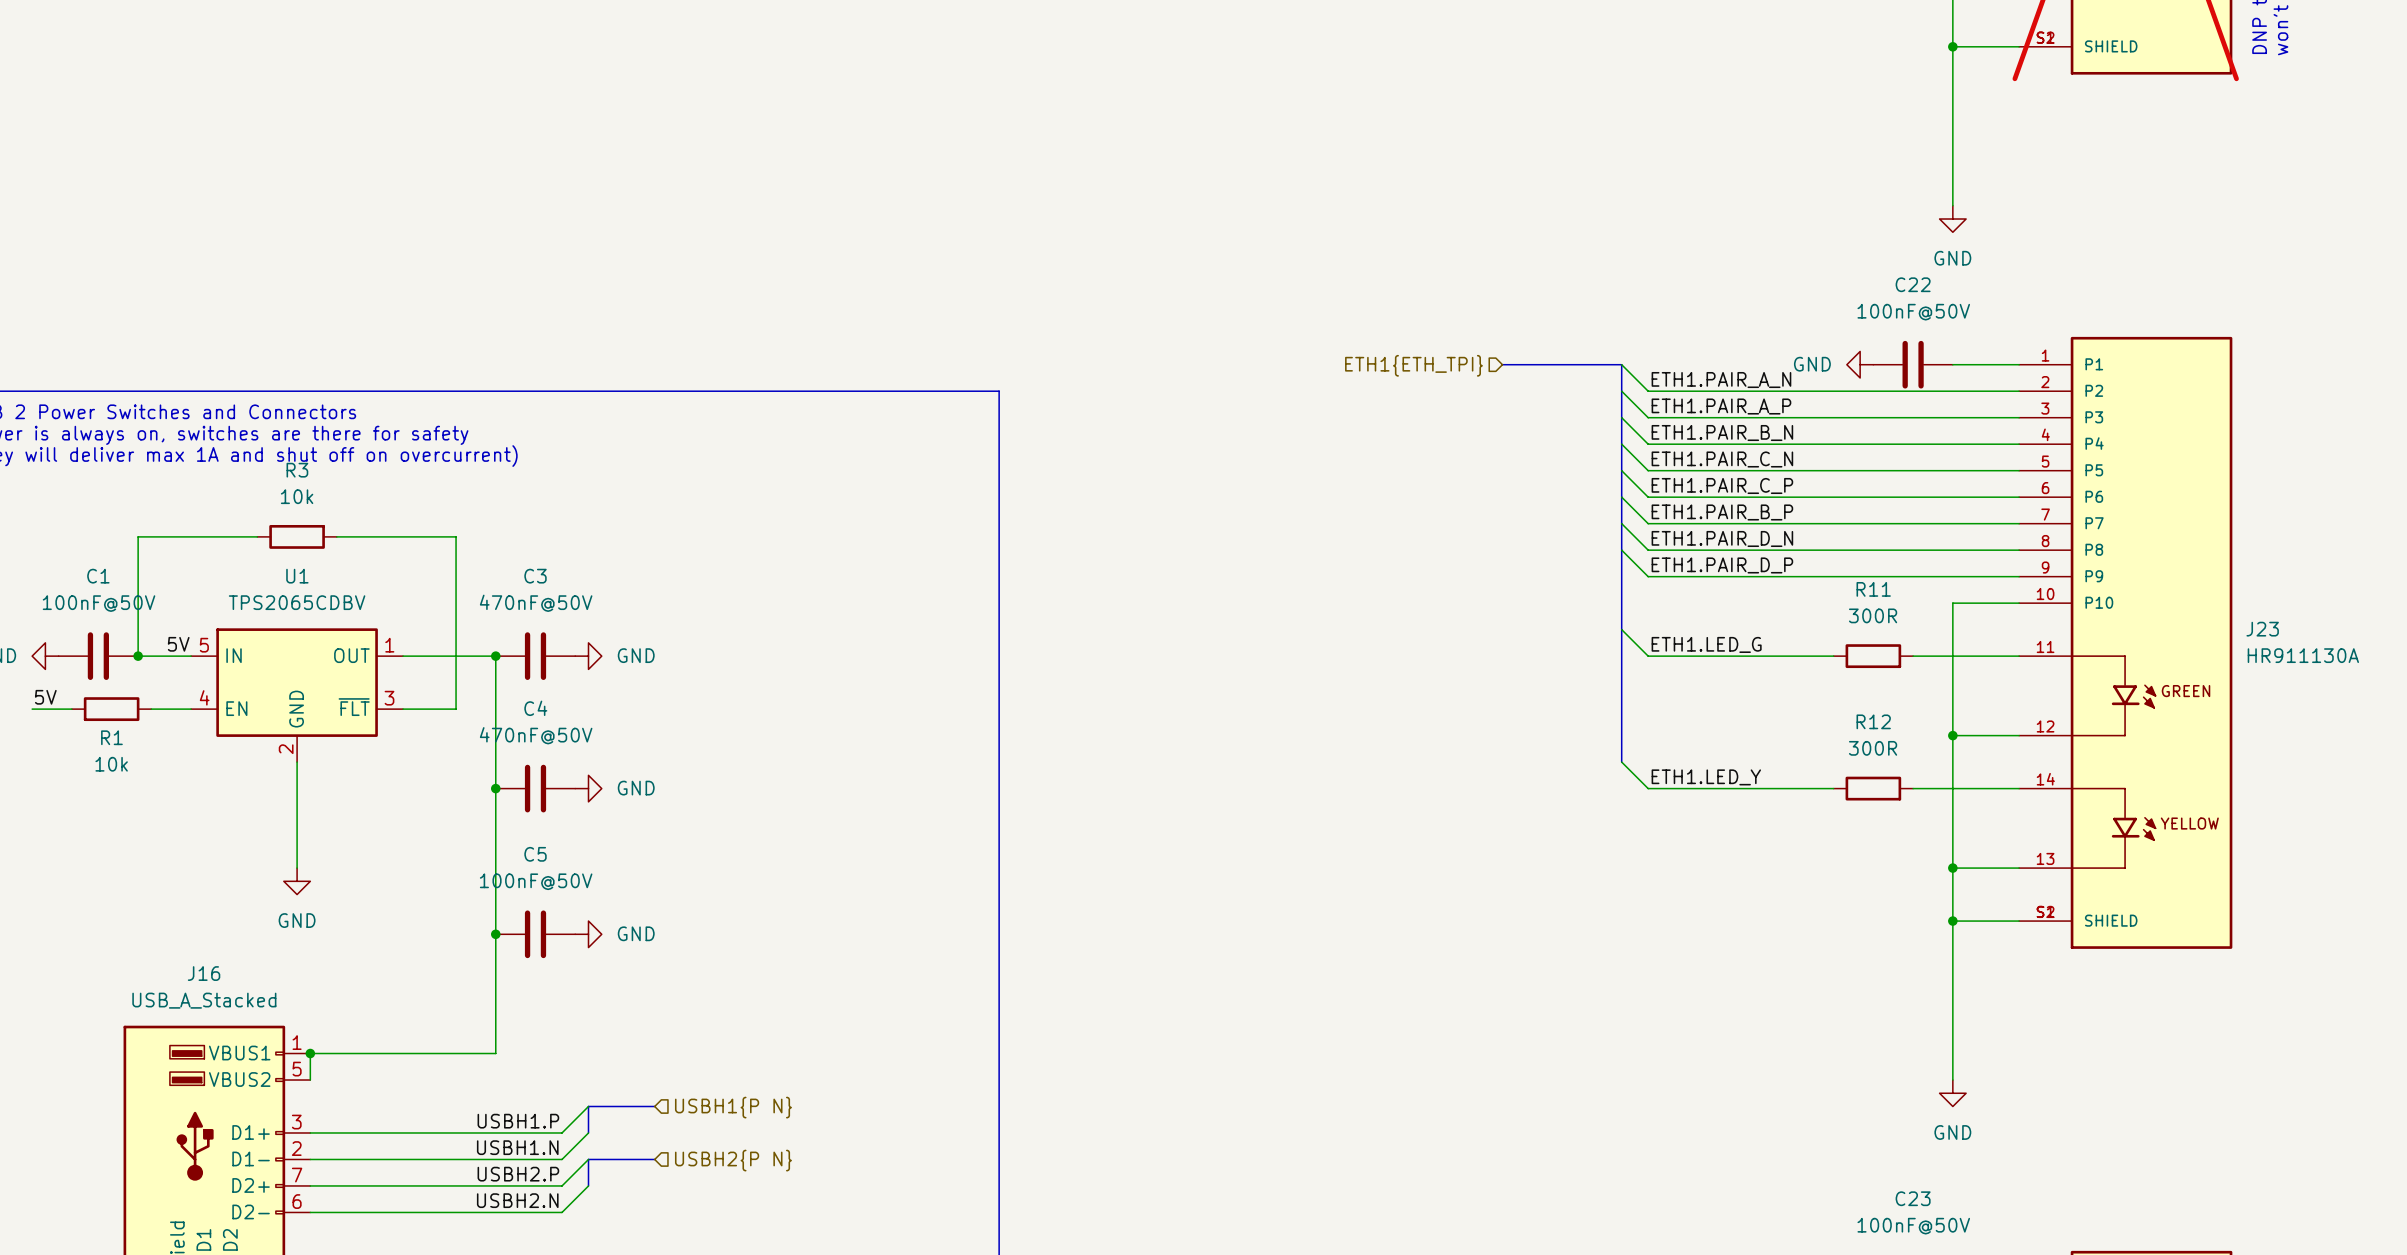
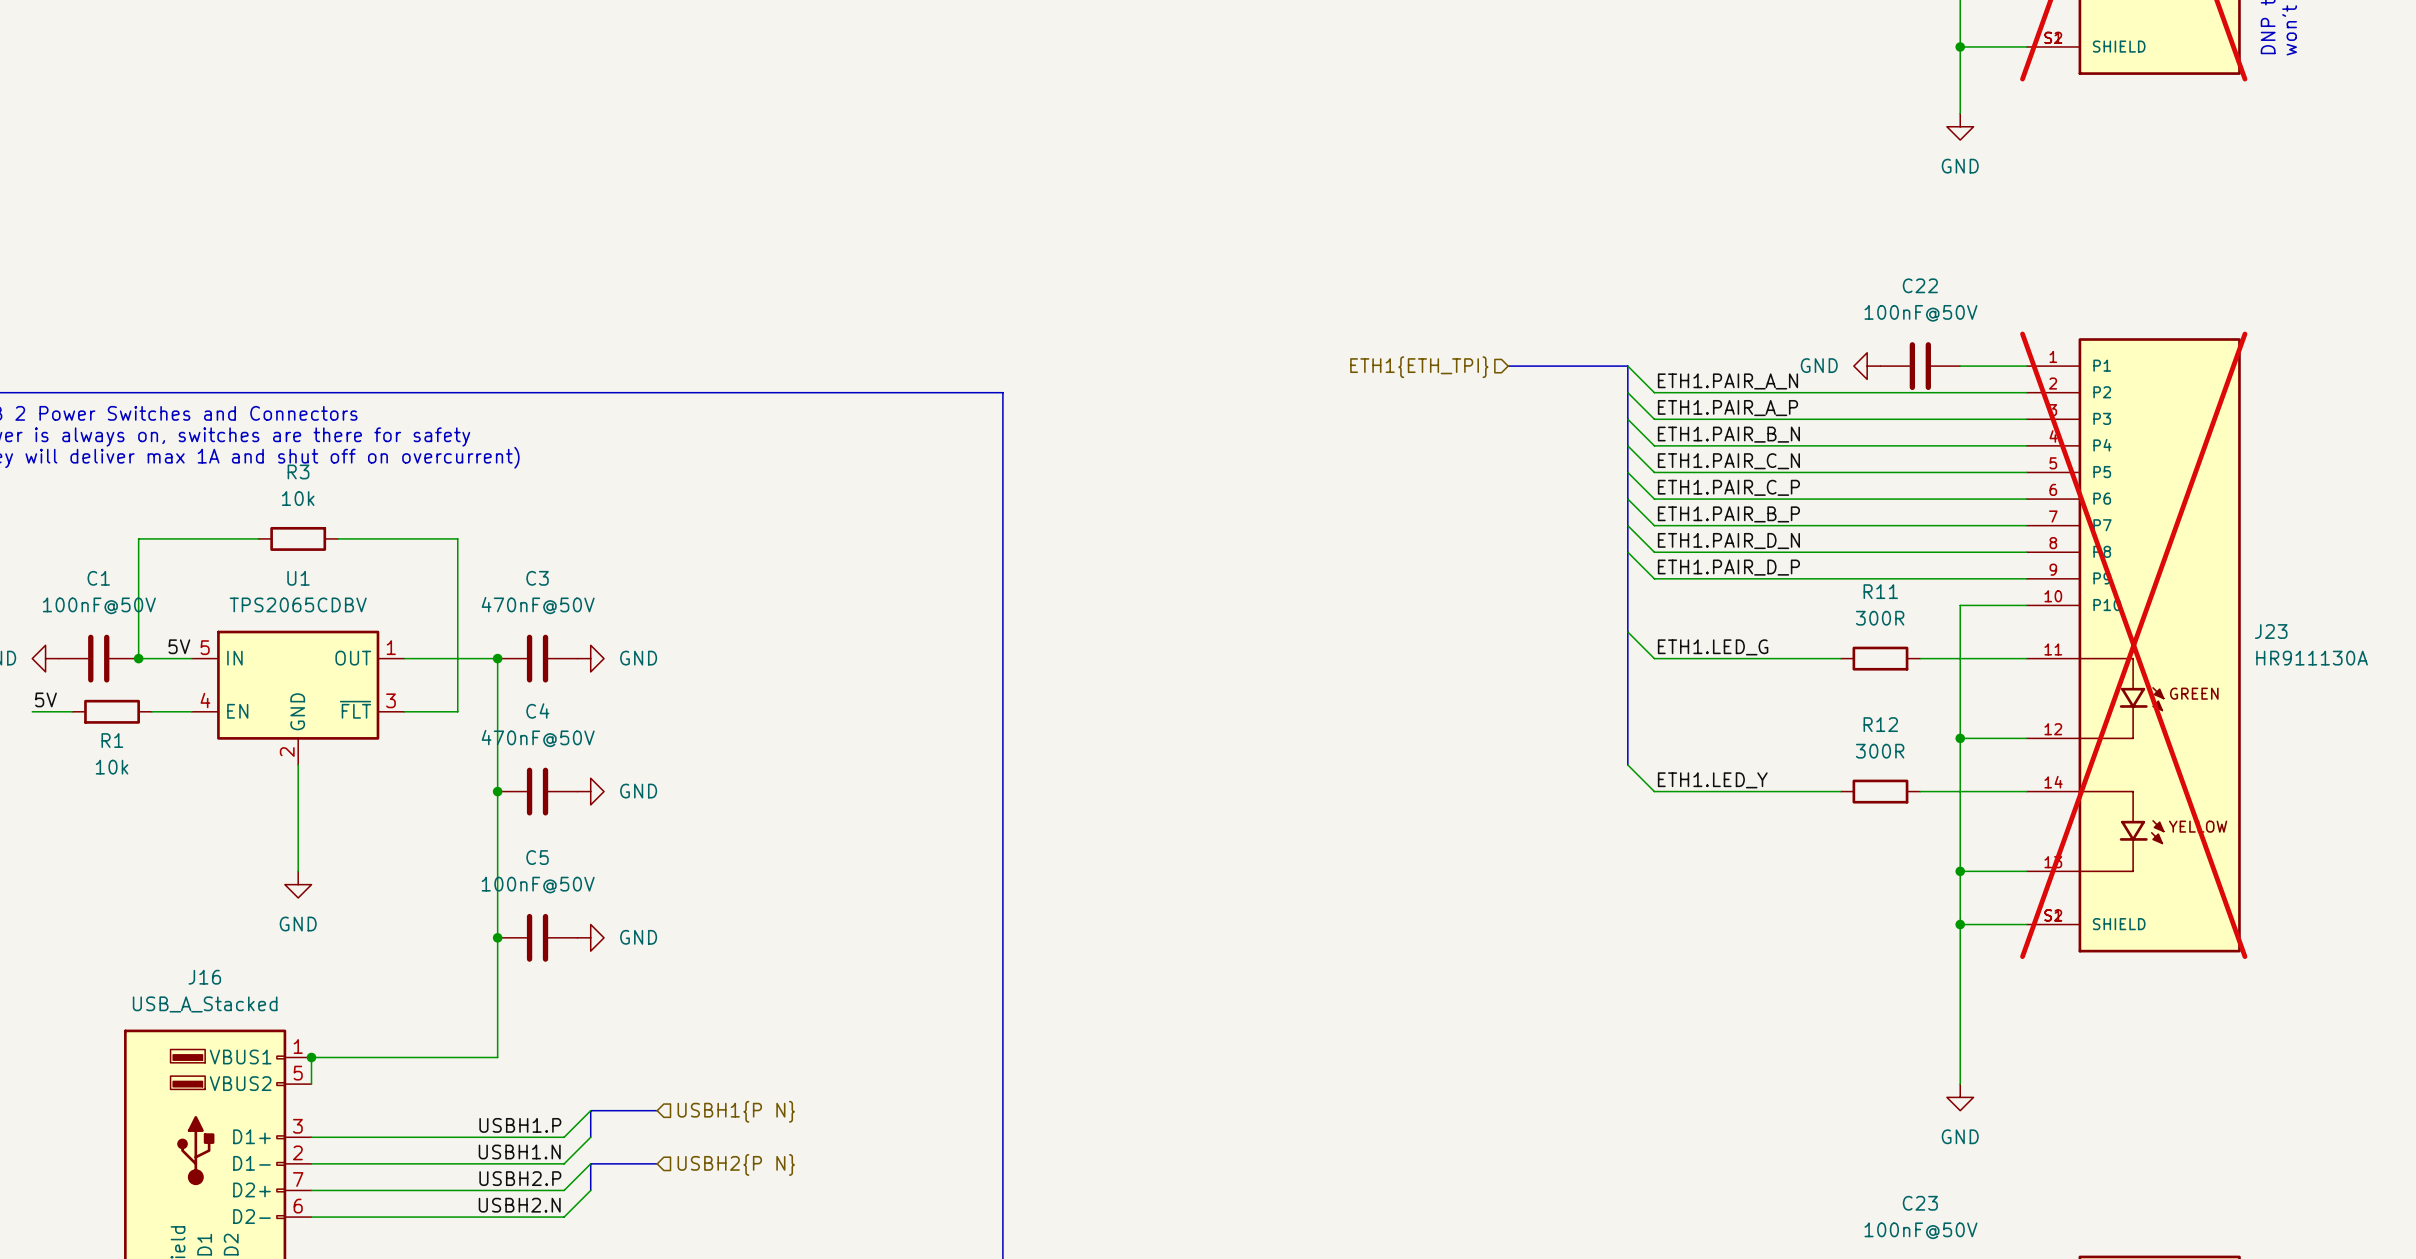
wire: (1952, 113) (1952, 205) -> none
power symbol position: GND (1952, 219) -> GND (1960, 126)
J23 do-not-place cross: none -> (2133, 645)

